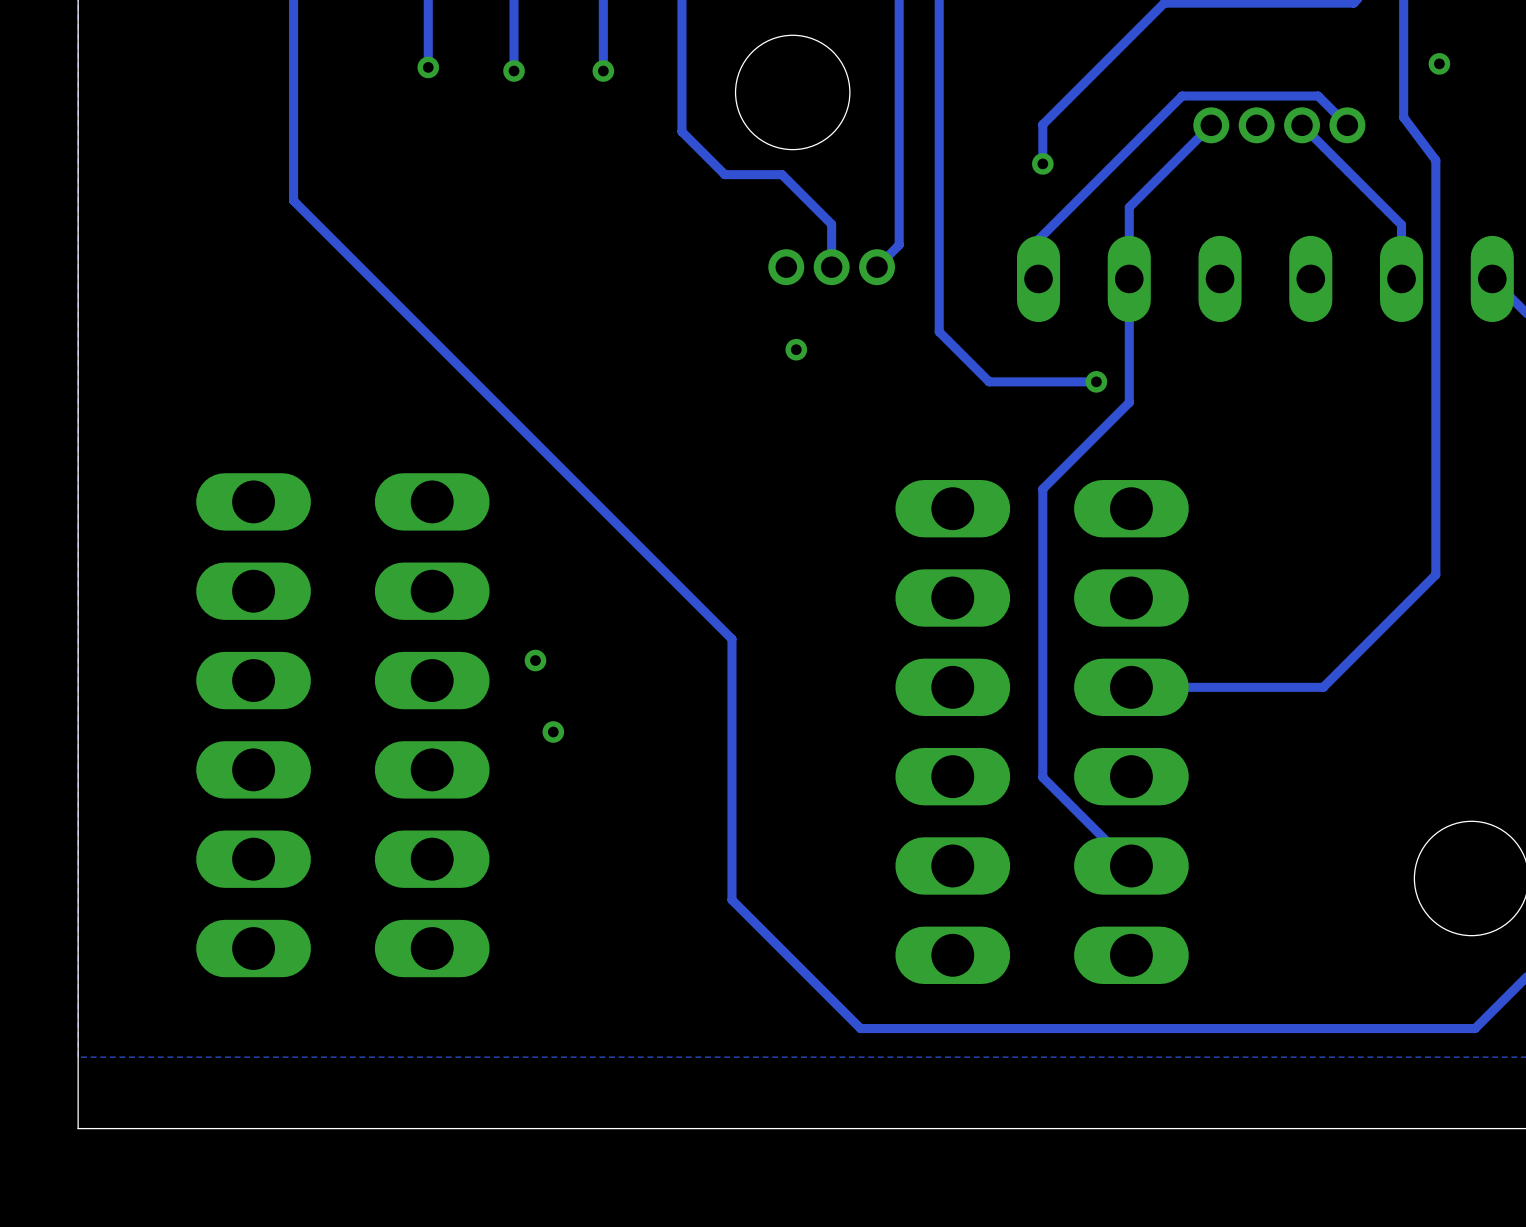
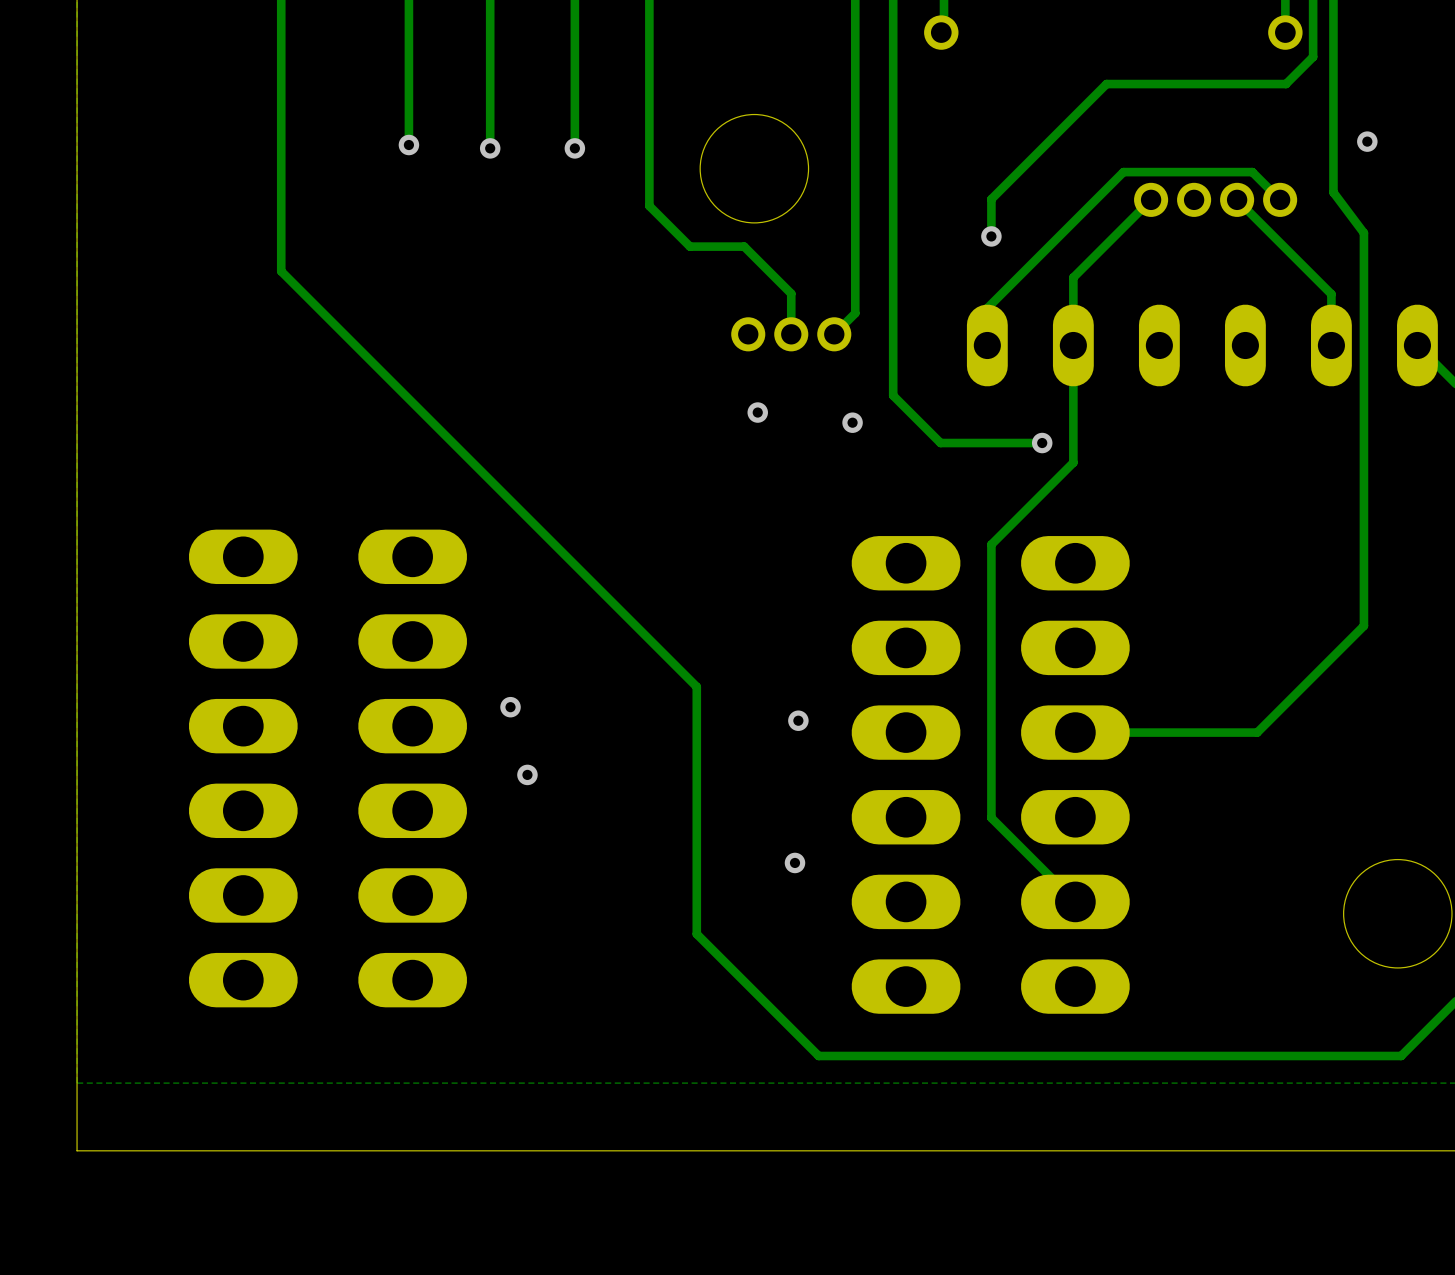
via: none -> (852, 422)
via: none -> (798, 720)
via: none -> (794, 862)

